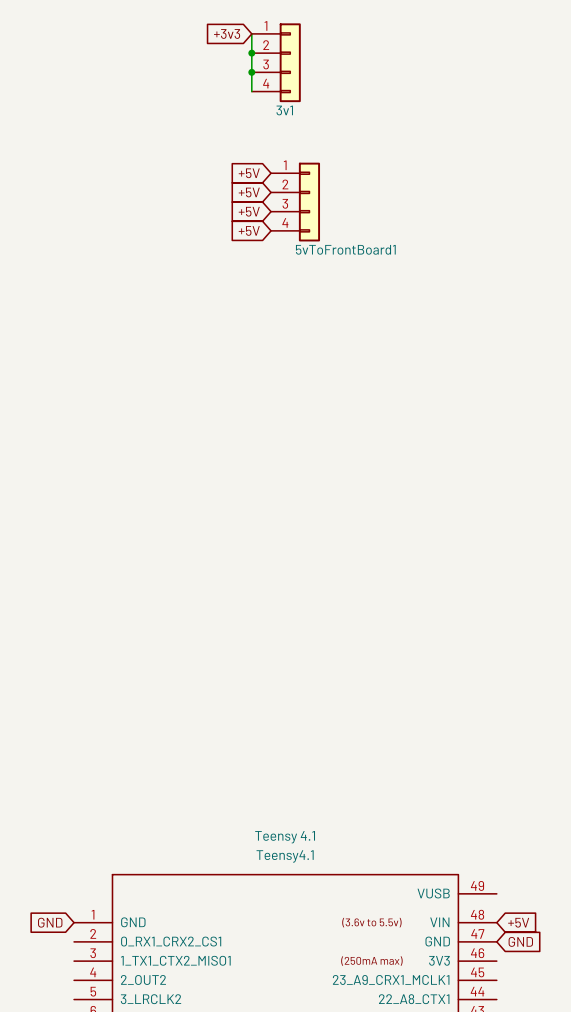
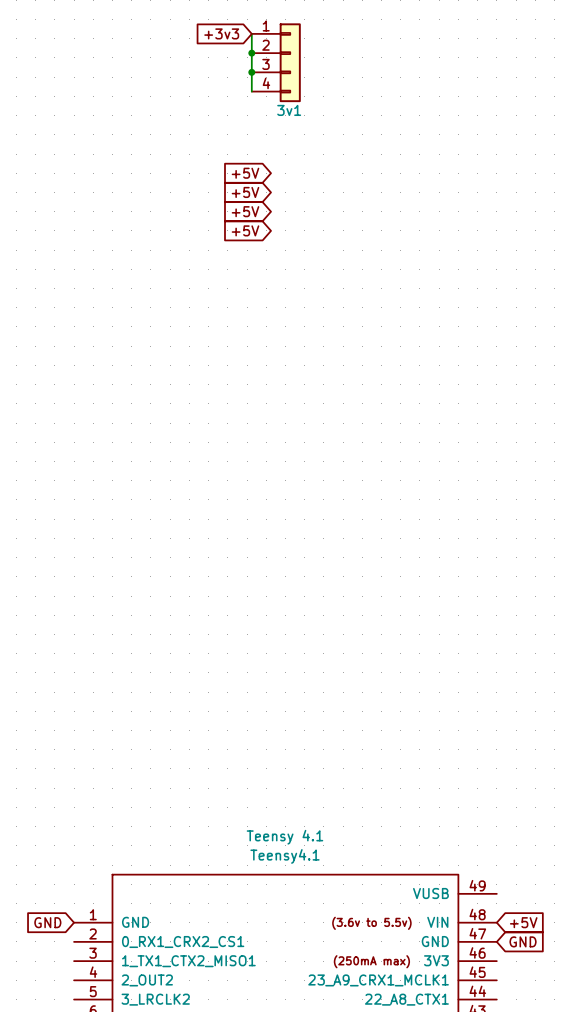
5vToFrontBoard1: (295, 202) -> none

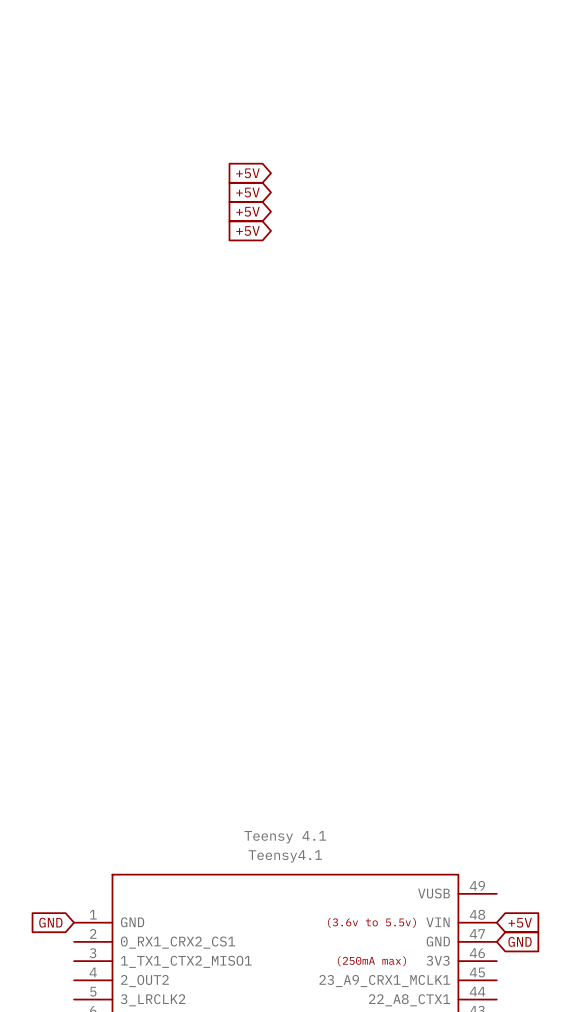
global label: +3v3 (221, 33) -> none
wire: (251, 33) (251, 91) -> none
junction: (251, 53) -> none
3v1: (276, 62) -> none
junction: (251, 72) -> none

